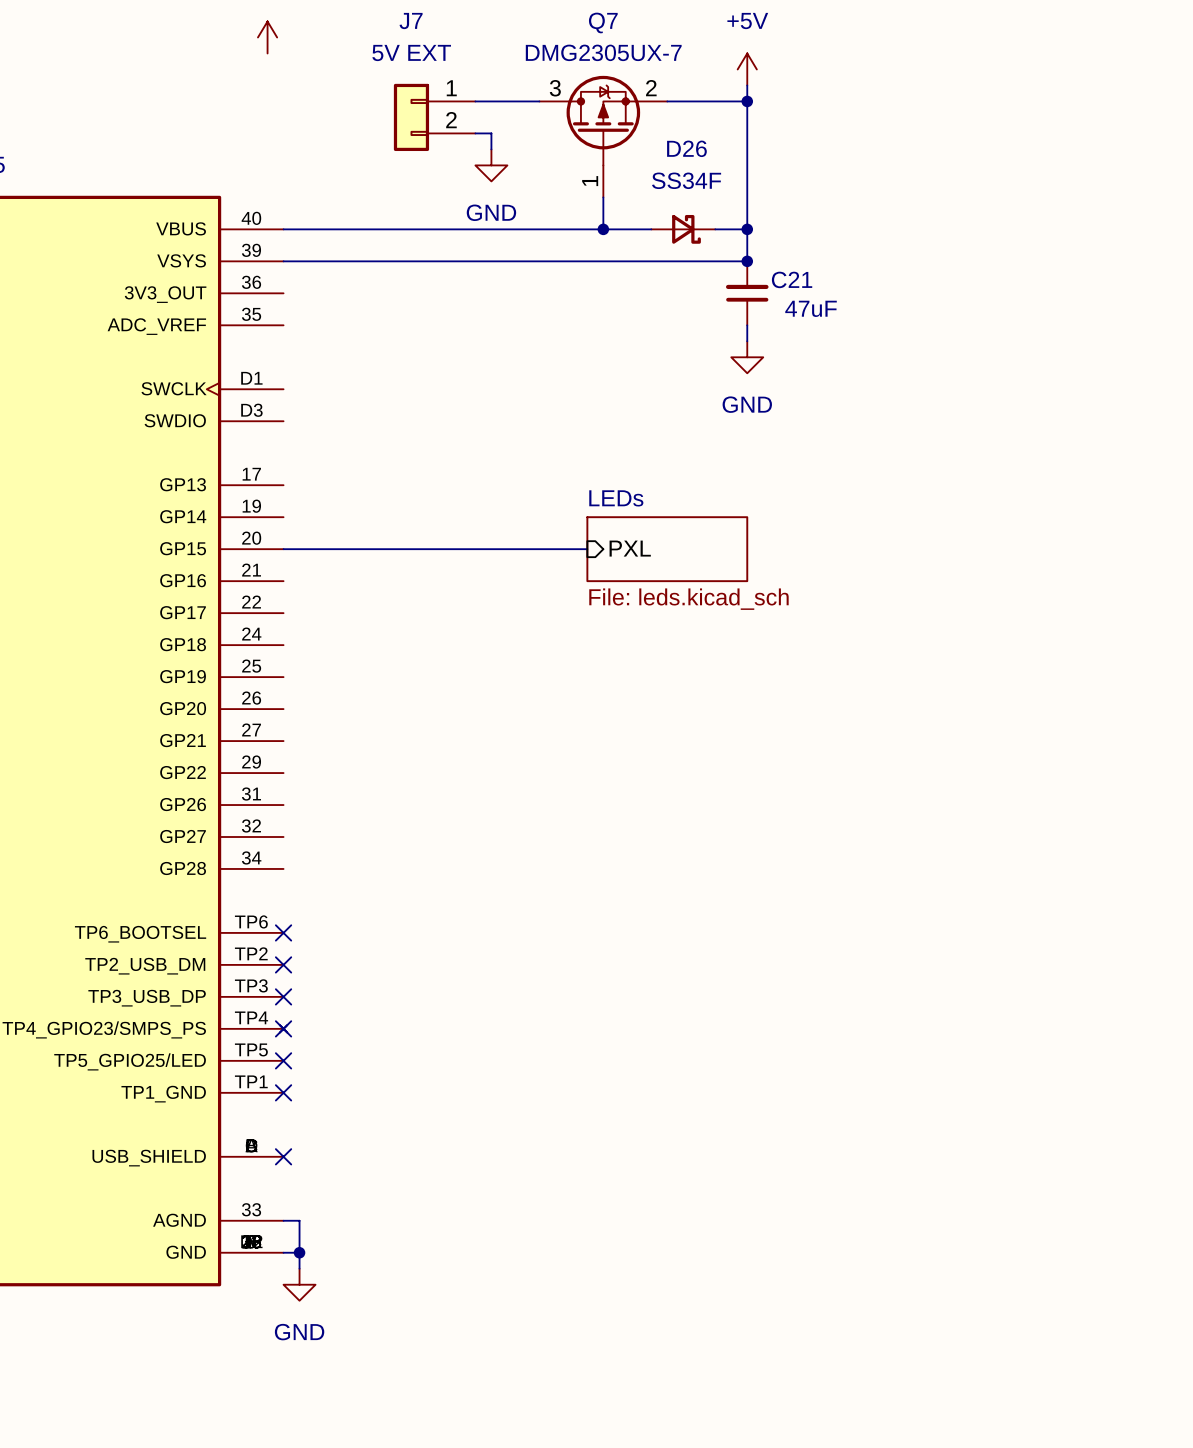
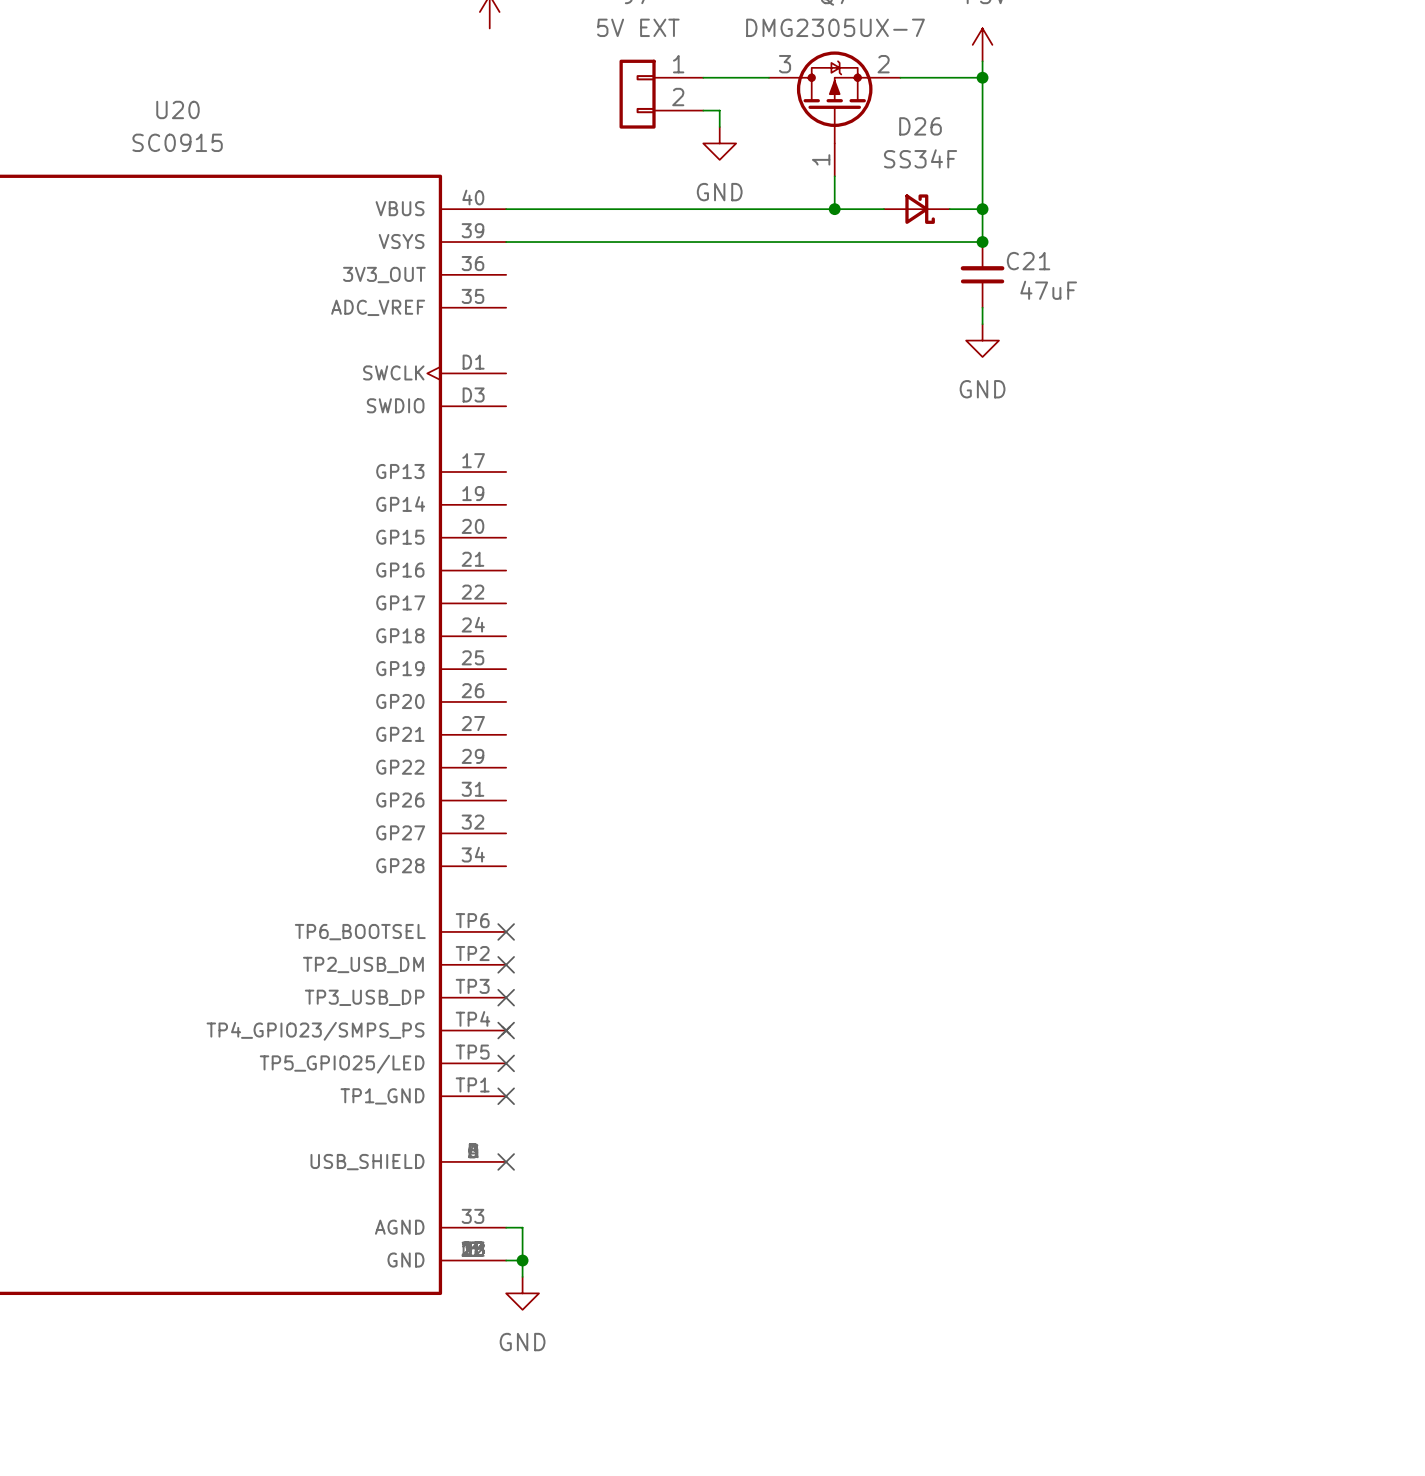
sheet pin: PXL (630, 548) -> none
wire: (283, 549) (587, 549) -> none
sheet LEDs: File: leds.kicad_sch (667, 549) -> none

